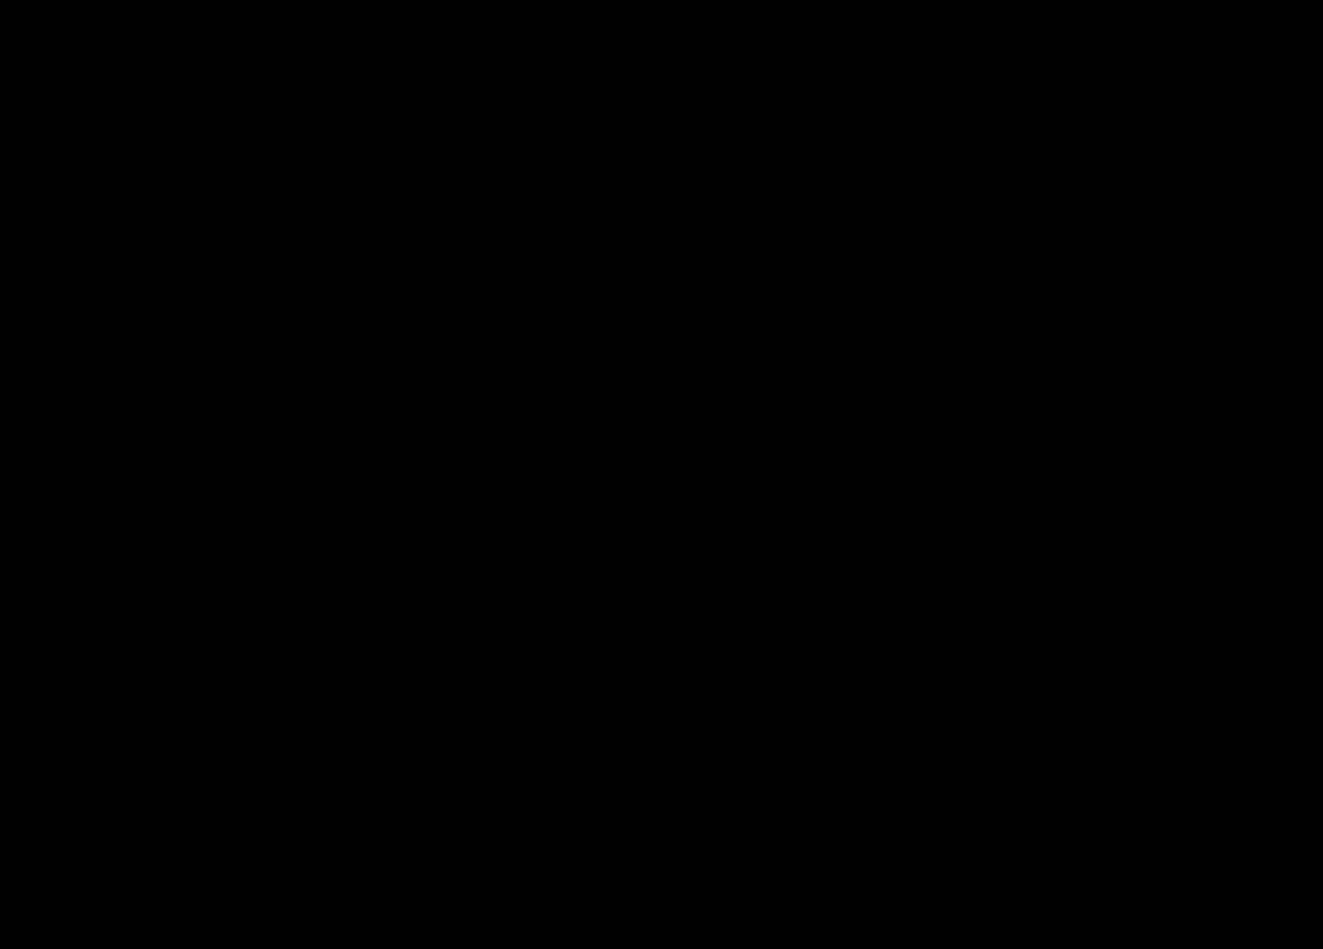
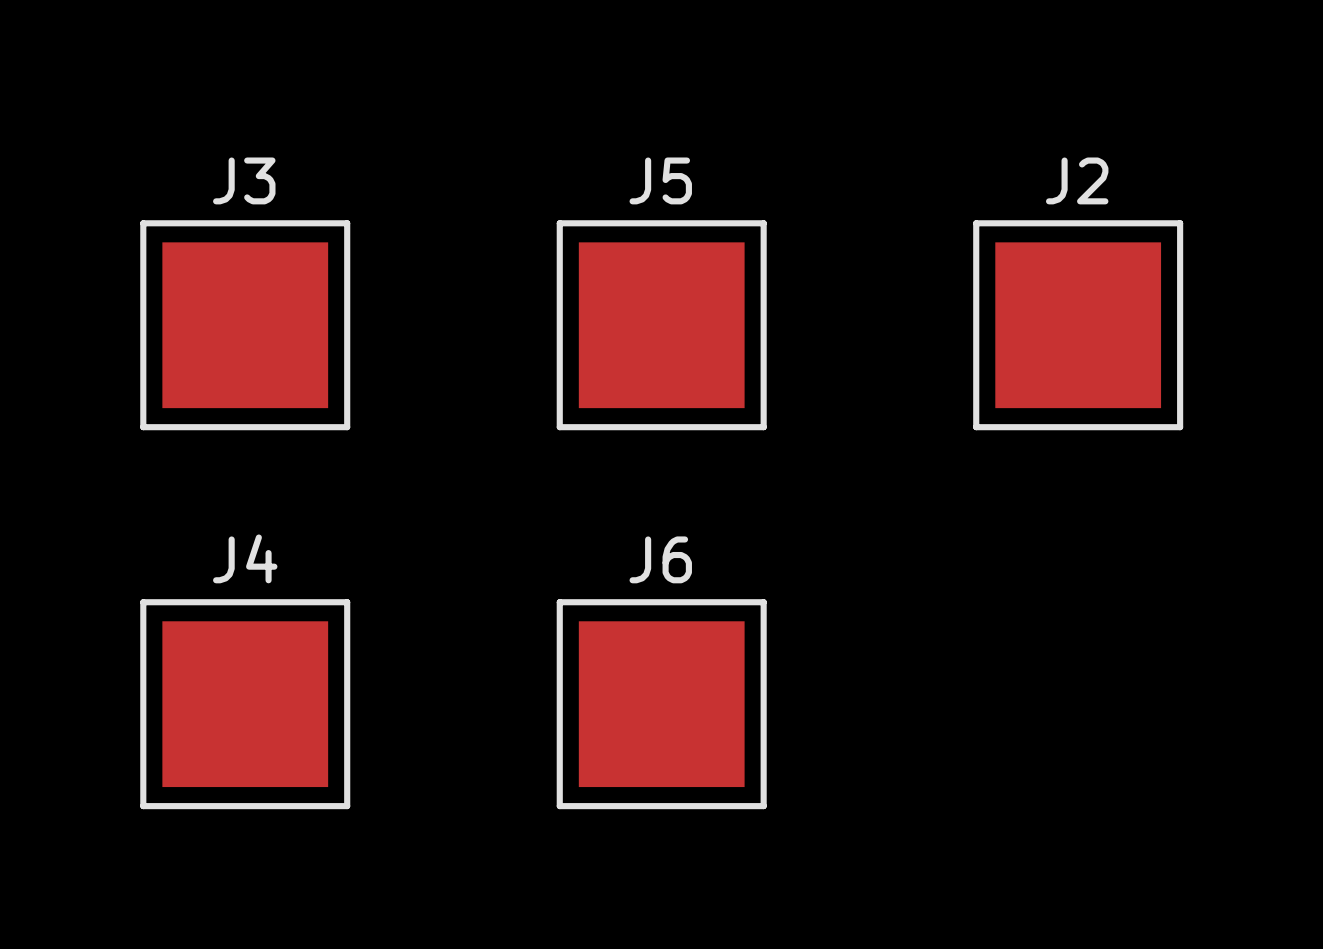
J3: none -> (245, 325)
J5: none -> (661, 325)
J2: none -> (1078, 325)
J4: none -> (245, 704)
J6: none -> (661, 704)

